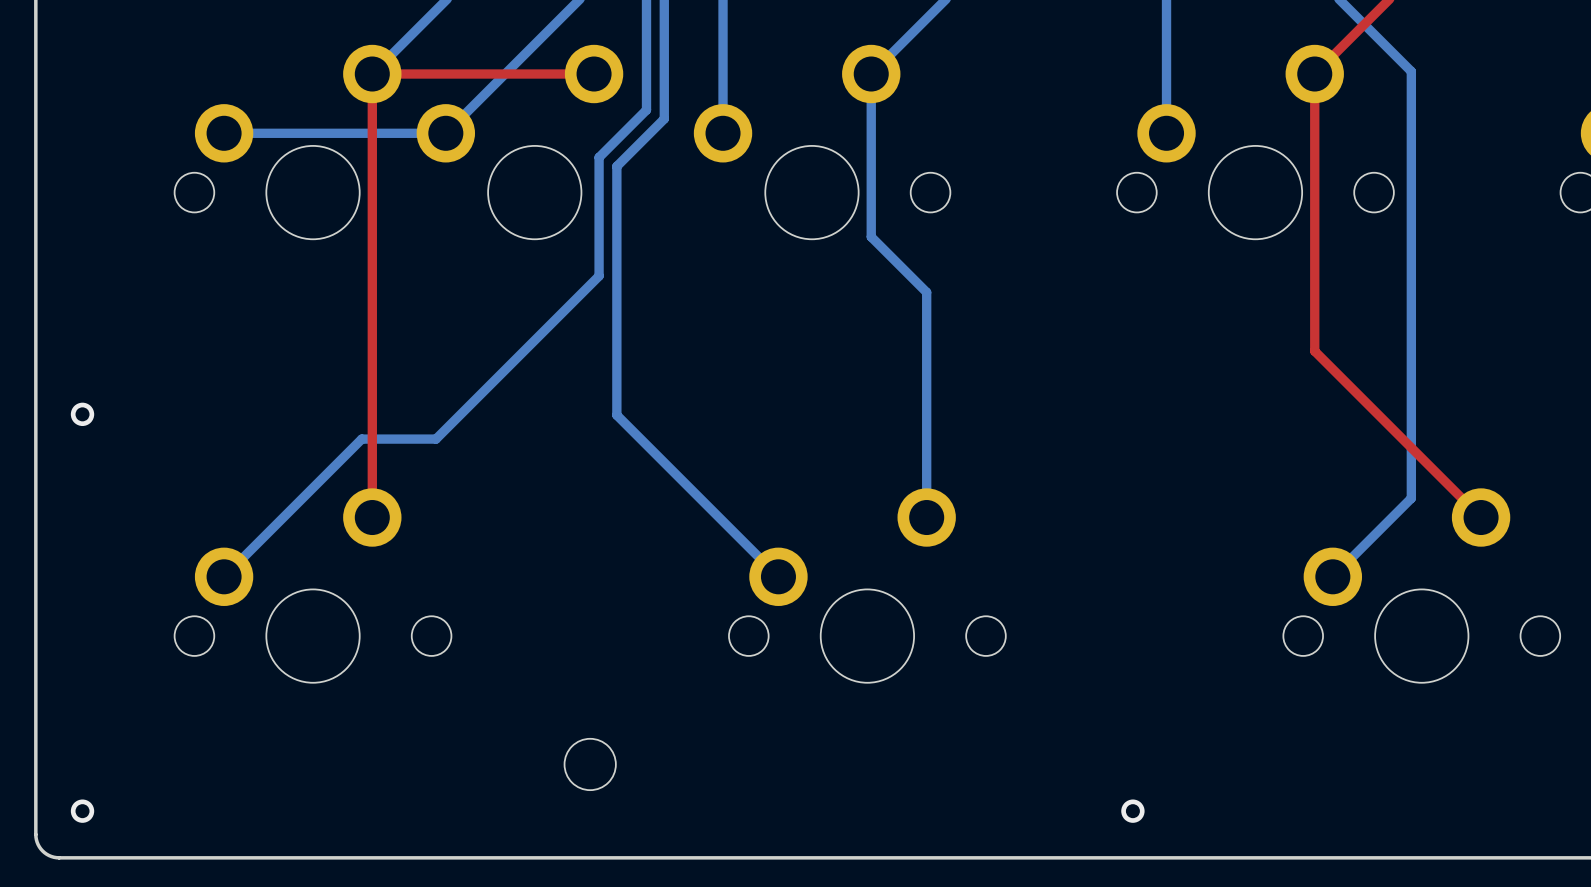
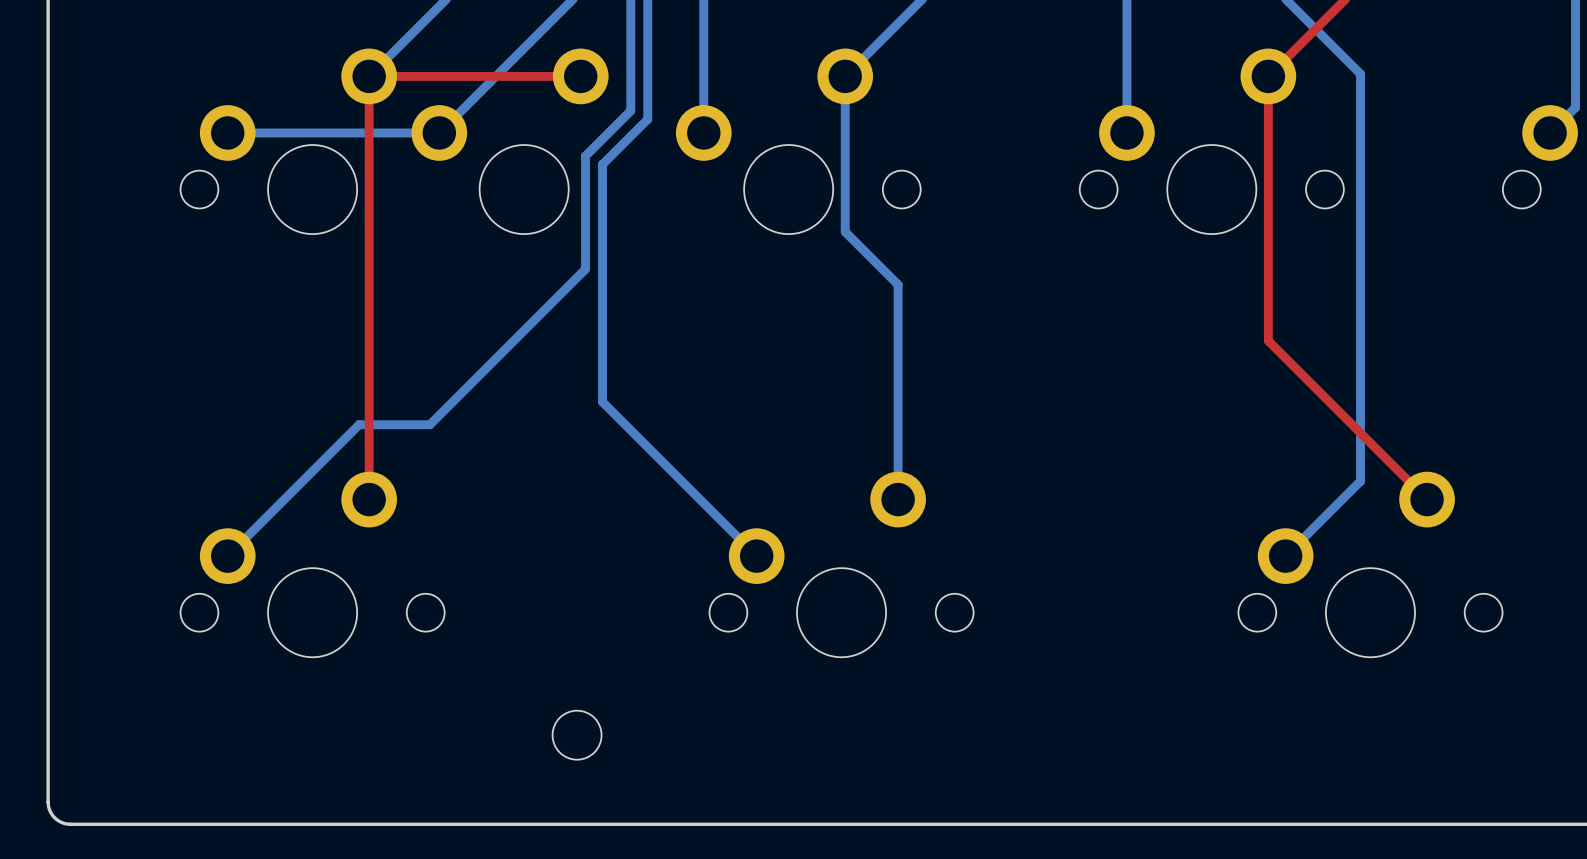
via: (82, 414) -> none
via: (82, 811) -> none
via: (1132, 811) -> none

